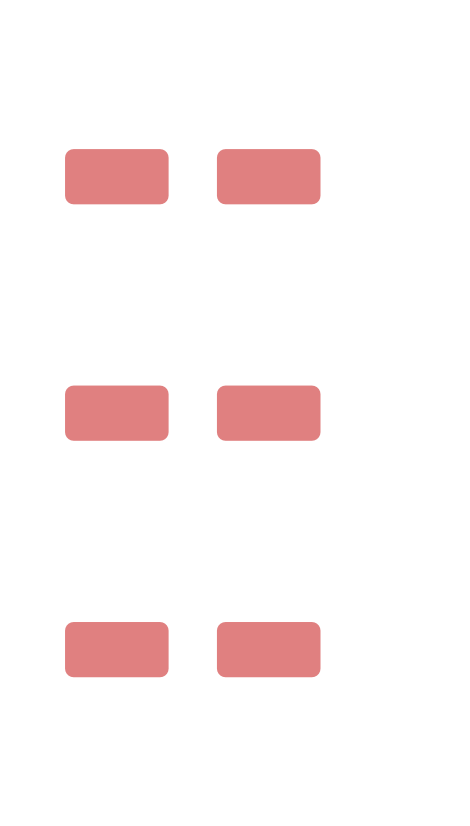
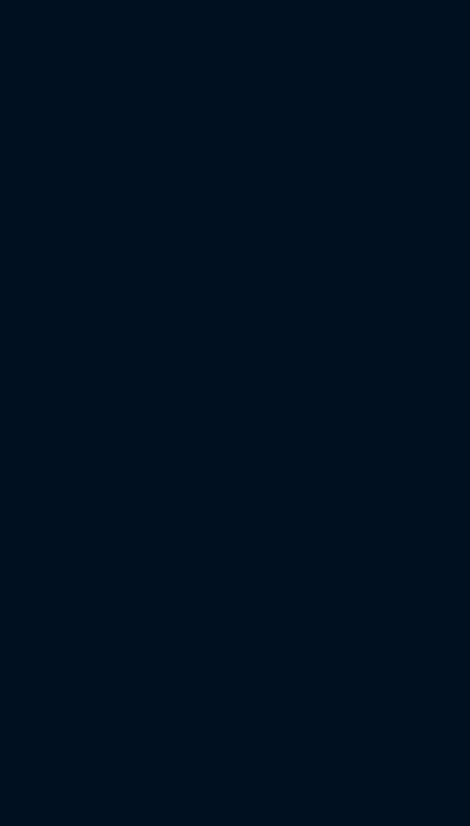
part: (192, 176) -> none
part: (192, 413) -> none
part: (192, 649) -> none

